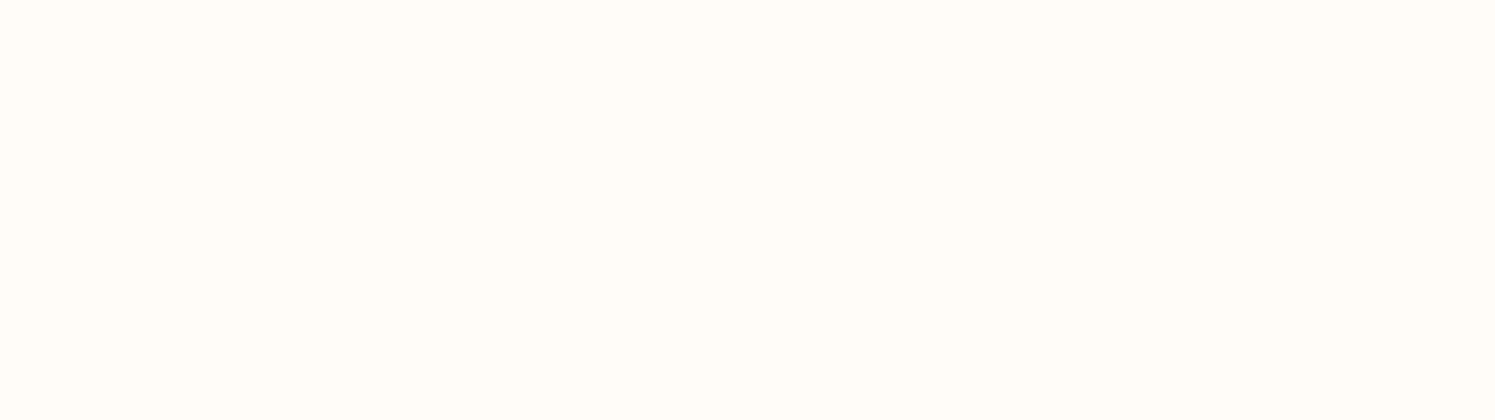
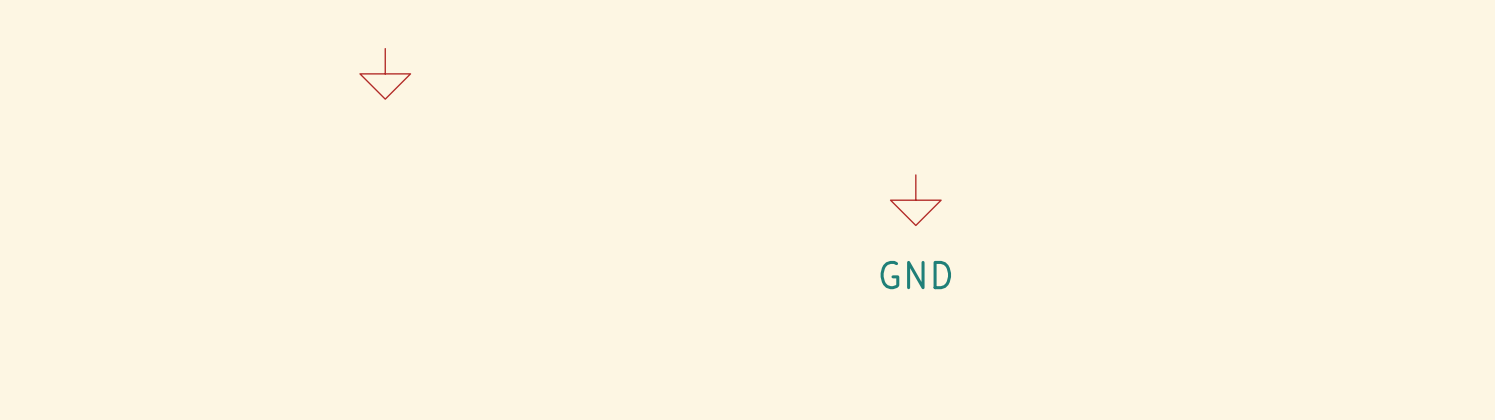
power symbol: none -> (385, 73)
power symbol: none -> GND (915, 200)

